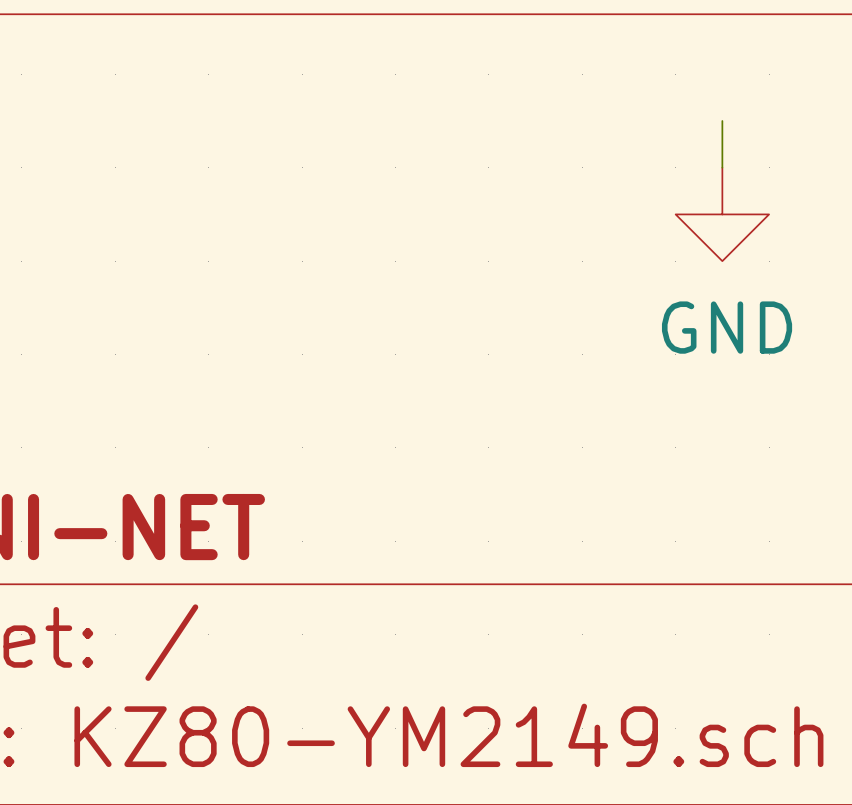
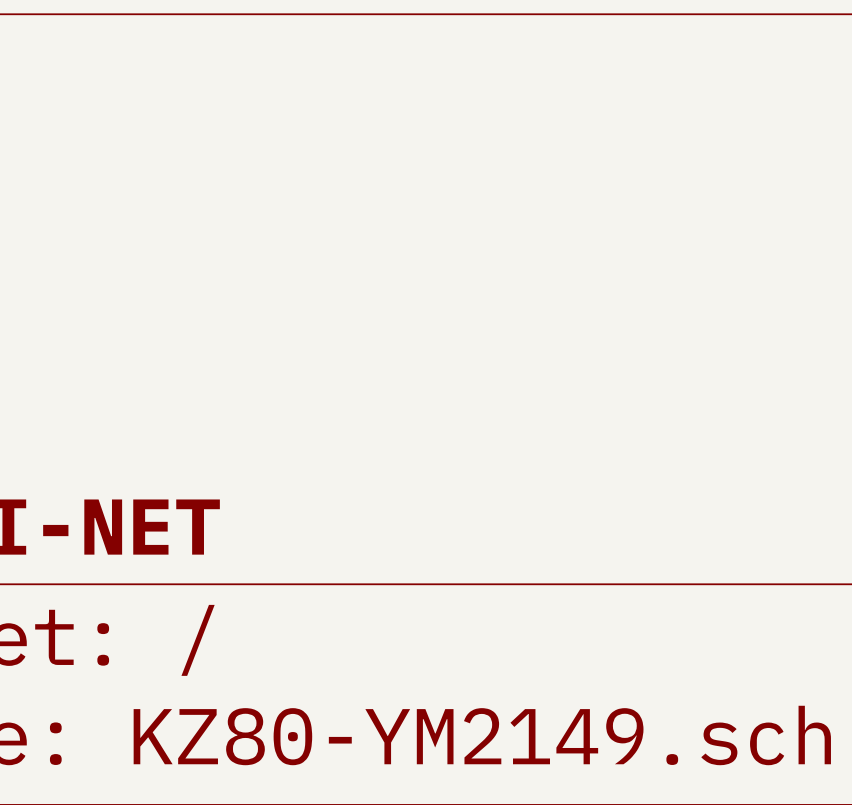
wire: (722, 121) (722, 167) -> none
power symbol: GND (722, 214) -> none

